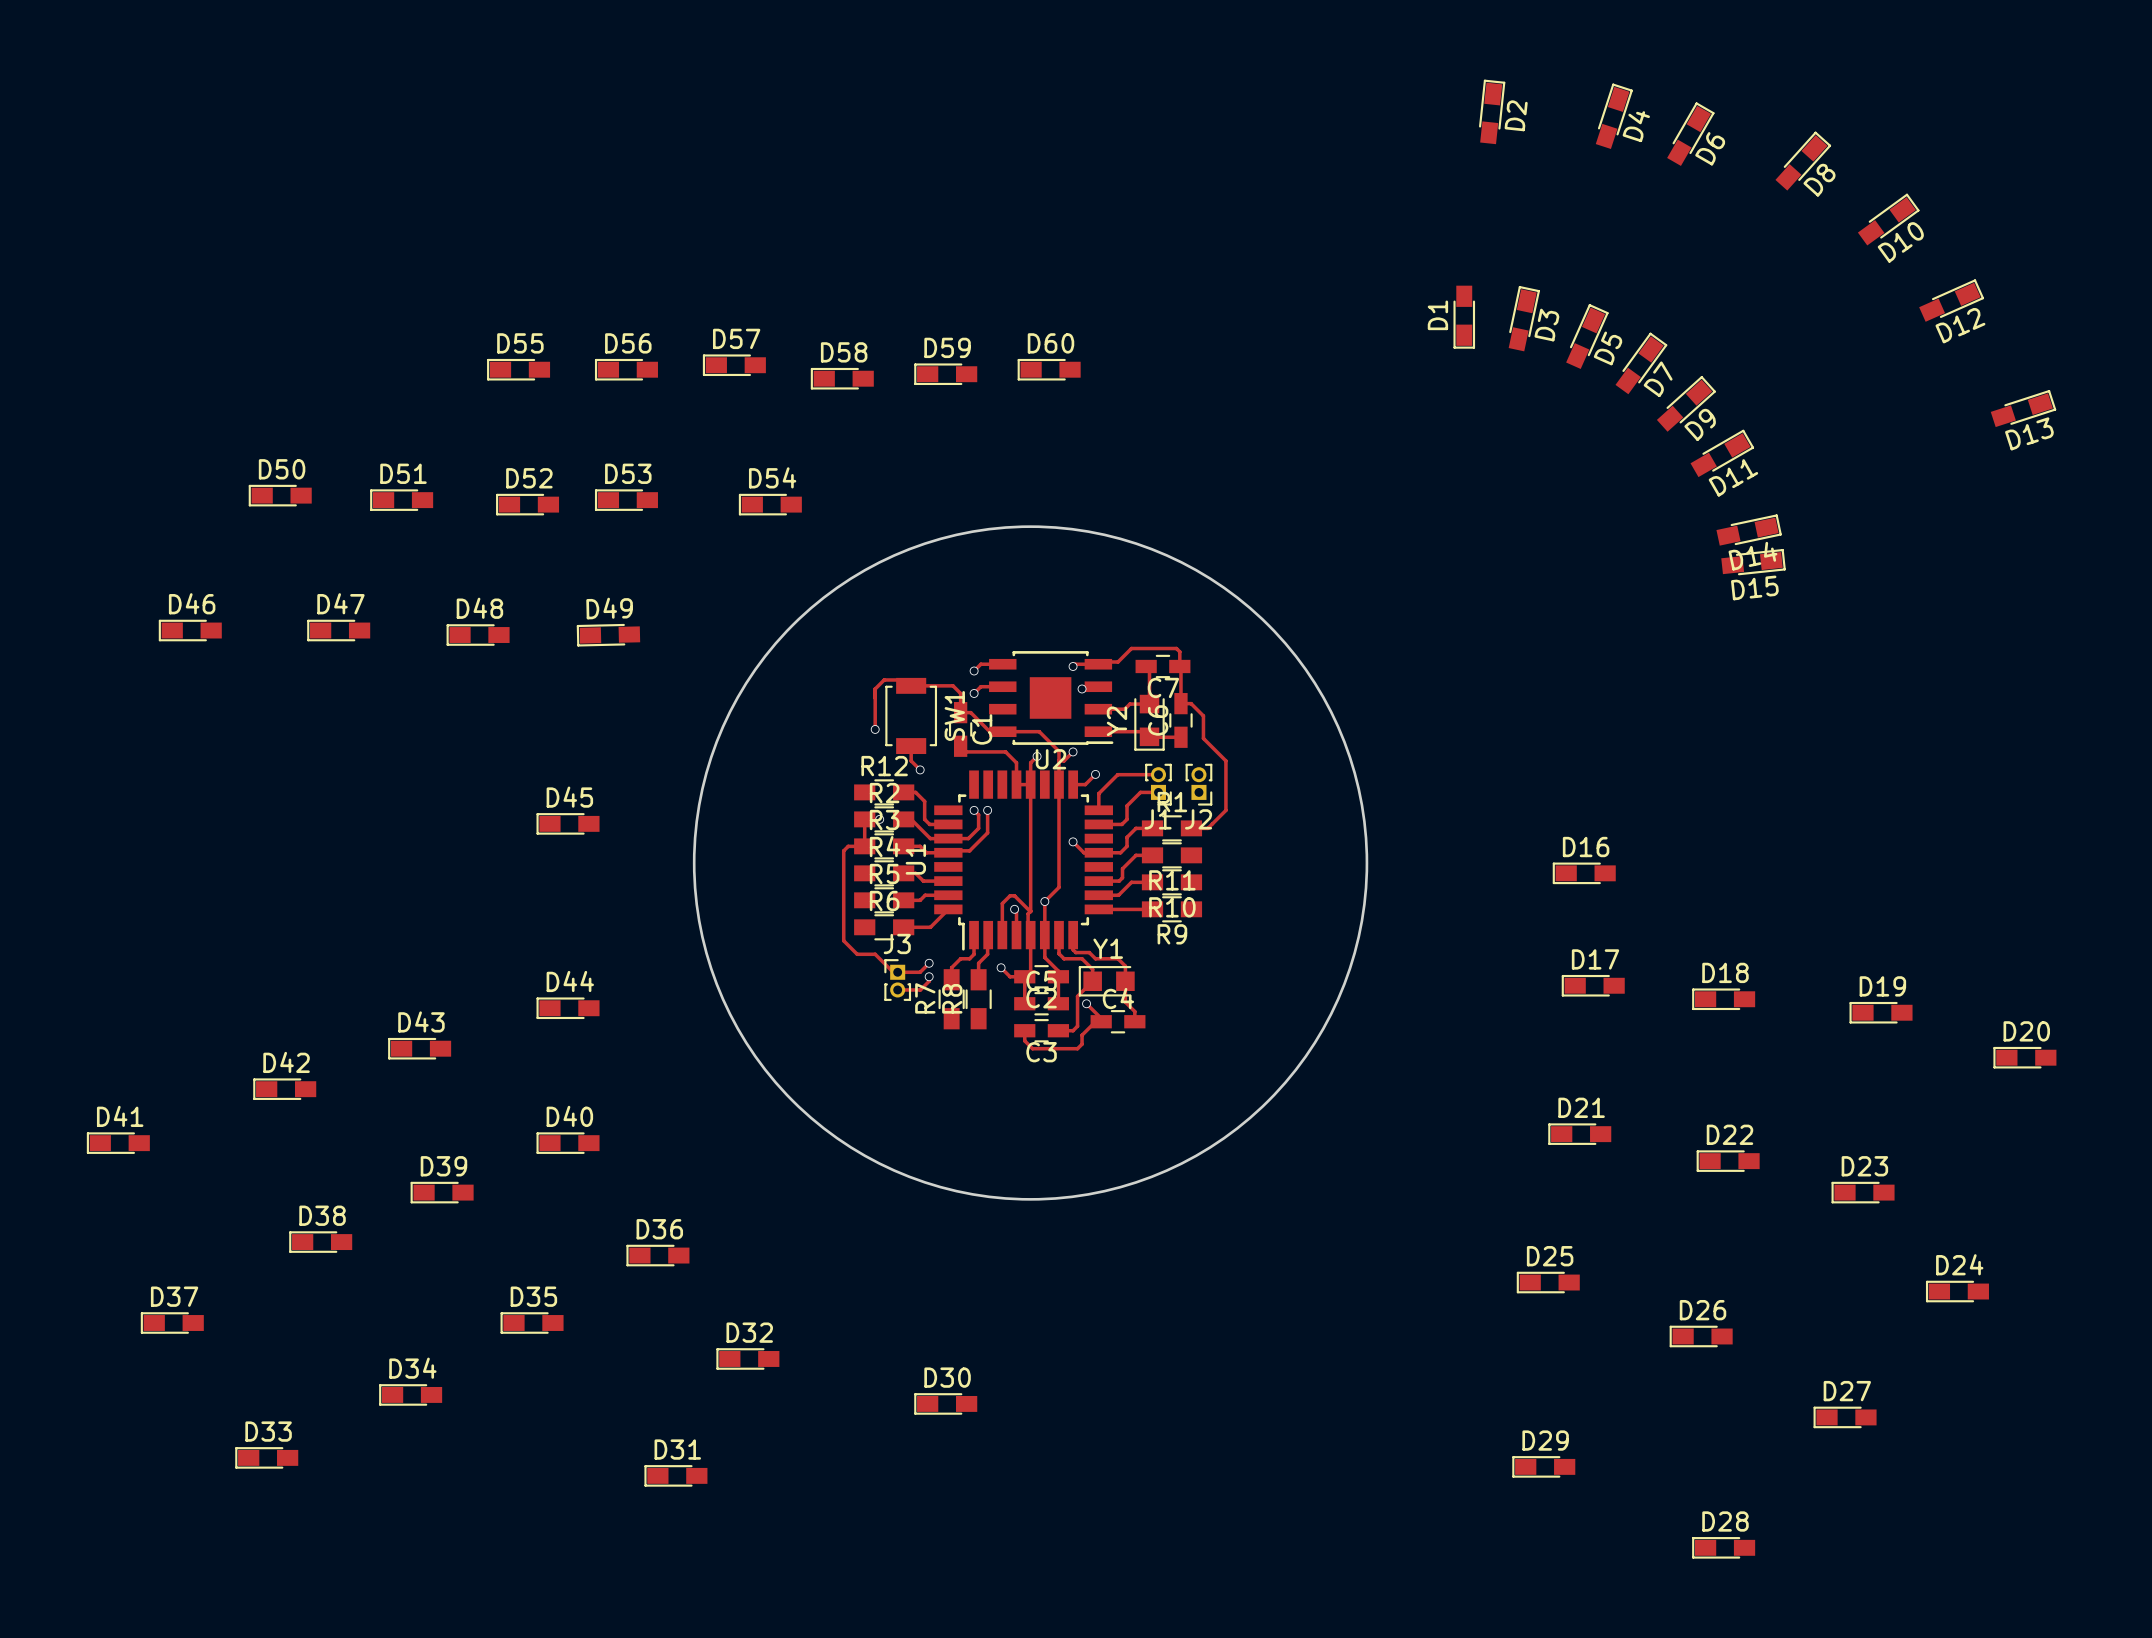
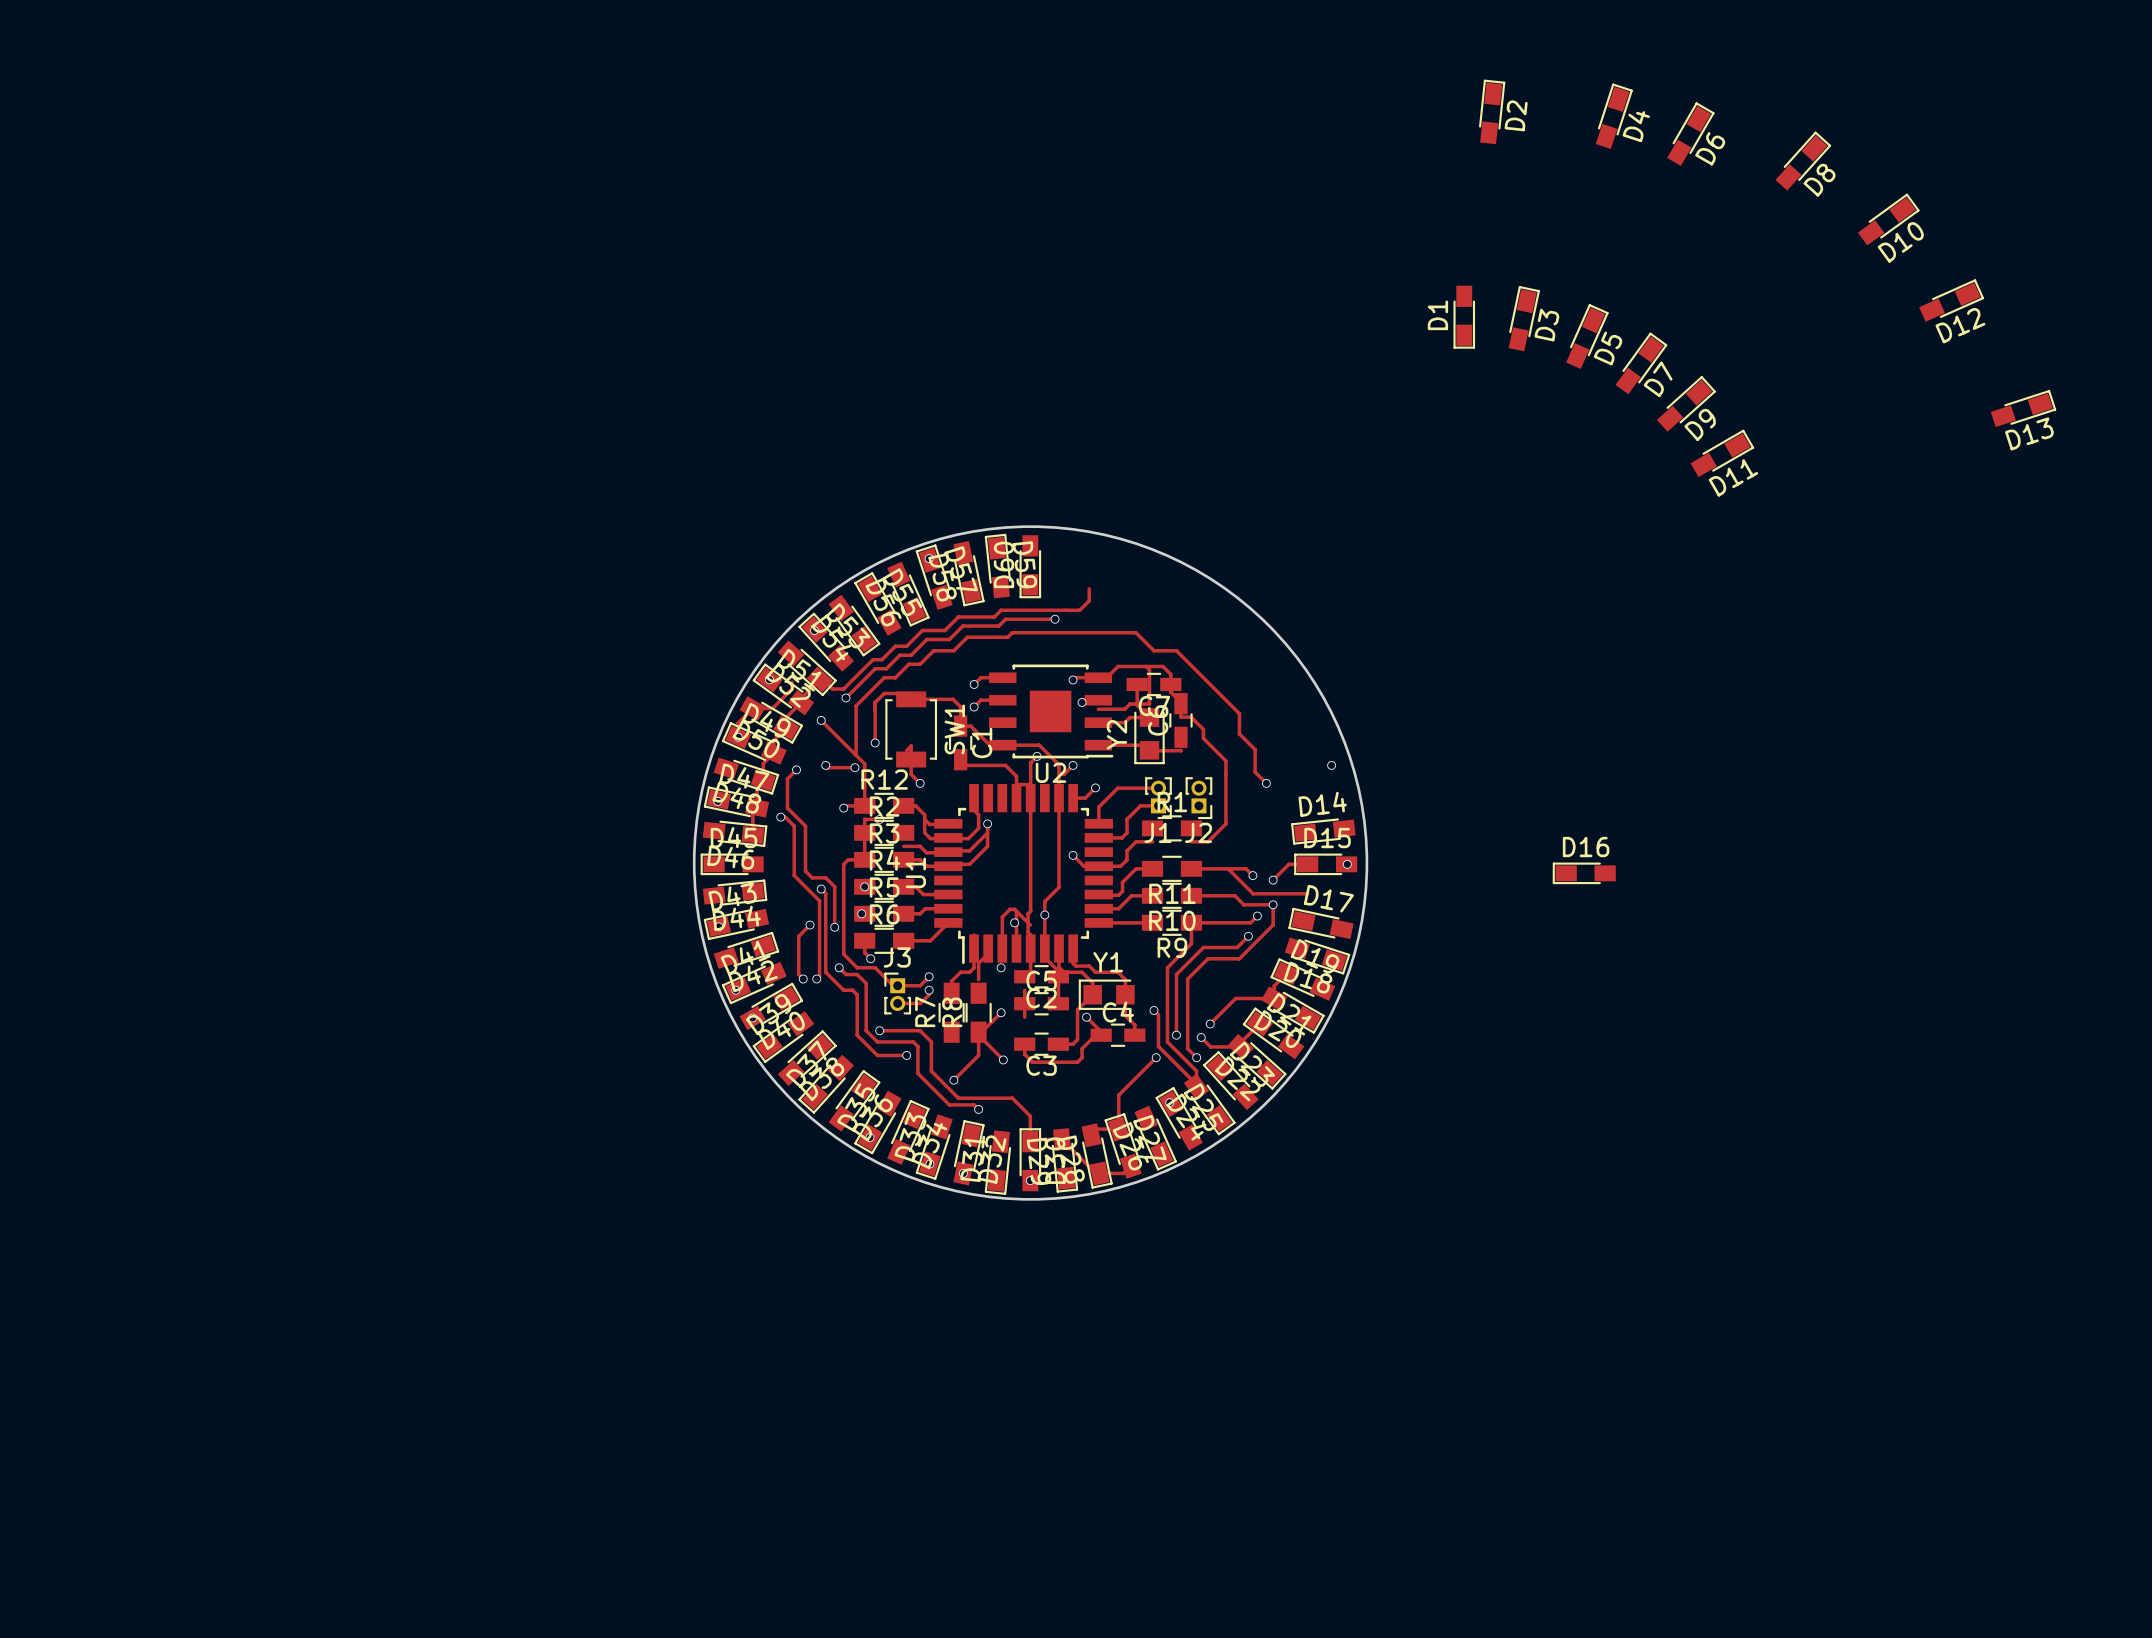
D57 rotation: 0° (734, 365) -> 72° clockwise (934, 577)
D57 position: (734, 365) -> (934, 577)
D55 rotation: 0° (518, 369) -> 60° clockwise (877, 604)
D55 position: (518, 369) -> (877, 604)
D56 rotation: 0° (626, 369) -> 114° counterclockwise (908, 594)
D56 position: (626, 369) -> (908, 594)
D60 rotation: 0° (1049, 369) -> 90° counterclockwise (1030, 566)
D60 position: (1049, 369) -> (1030, 566)
D59 rotation: 0° (945, 374) -> 84° clockwise (997, 566)
D59 position: (945, 374) -> (997, 566)
D58 rotation: 0° (842, 378) -> 102° counterclockwise (968, 573)
D58 position: (842, 378) -> (968, 573)
D50 rotation: 0° (280, 495) -> 150° counterclockwise (771, 719)
D50 position: (280, 495) -> (771, 719)
D51 rotation: 0° (401, 500) -> 36° clockwise (783, 689)
D51 position: (401, 500) -> (783, 689)
D53 rotation: 0° (626, 500) -> 48° clockwise (826, 642)
D53 position: (626, 500) -> (826, 642)
D52 rotation: 0° (527, 504) -> 138° counterclockwise (807, 668)
D52 position: (527, 504) -> (807, 668)
D54 rotation: 0° (770, 504) -> 126° counterclockwise (854, 625)
D54 position: (770, 504) -> (854, 625)
D14 rotation: 0° (1749, 530) -> 174° counterclockwise (1323, 831)
D14 position: (1749, 530) -> (1323, 831)
via: none -> (929, 558)
D15 rotation: 0° (1753, 562) -> 174° counterclockwise (1325, 864)
D15 position: (1753, 562) -> (1325, 864)
track: none -> (1089, 588) (1089, 600) (1079, 610) (1001, 610) (994, 617) (958, 617) (944, 630) (922, 630) (906, 646) (895, 646) (881, 659) (872, 659) (843, 688) (832, 688) (823, 679) (819, 679) (801, 698) (801, 702) (786, 717) (786, 727) (773, 740) (773, 753) (763, 763) (763, 780) (757, 786) (757, 807) (752, 811) (752, 834)
track: none -> (1055, 619) (1005, 619) (998, 626) (962, 626) (949, 639) (926, 639) (911, 655) (899, 655) (886, 668) (875, 668) (845, 697)
via: none -> (1055, 619)
D46 rotation: 0° (190, 630) -> 174° counterclockwise (735, 833)
D46 position: (190, 630) -> (735, 833)
D47 rotation: 0° (338, 630) -> 12° clockwise (736, 802)
D47 position: (338, 630) -> (736, 802)
via: none -> (814, 630)
D48 rotation: 0° (478, 635) -> 162° counterclockwise (746, 776)
D48 position: (478, 635) -> (746, 776)
D49 rotation: 0° (608, 635) -> 25.3° clockwise (754, 743)
D49 position: (608, 635) -> (754, 743)
track: (1002, 664) (980, 664) (974, 670) -> (1002, 677) (980, 677) (974, 684)
track: (1073, 666) (1075, 664) (1118, 662) (1131, 648) (1176, 648) (1179, 651) (1180, 702) -> (1073, 679) (1075, 677) (1106, 677) (1118, 666) (1162, 666) (1170, 674) (1170, 692) (1180, 702)
via: (1073, 666) -> none
C7 position: (1162, 666) -> (1153, 684)
via: (974, 670) -> none
via: none -> (769, 679)
via: none -> (1073, 679)
track: none -> (792, 682) (792, 688) (772, 708) (752, 708) (738, 722) (736, 737)
via: none -> (974, 684)
track: none -> (1137, 684) (1137, 705) (1149, 717) (1129, 717) (1124, 722) (1098, 722)
track: (1002, 686) (980, 686) (974, 693) -> (1002, 700) (980, 700) (974, 706)
via: (1082, 688) -> none
via: (974, 693) -> none
via: none -> (845, 697)
U2 position: (1051, 697) -> (1051, 711)
track: (875, 702) (875, 688) (884, 679) (905, 679) (911, 685) (953, 685) (960, 693) (960, 706) -> (875, 702) (884, 693) (905, 693) (911, 699) (953, 699) (960, 706)
via: none -> (1082, 702)
track: (1180, 703) (1191, 703) (1203, 715) (1203, 729) -> (1180, 703) (1180, 717) (1191, 717) (1203, 729)
via: none -> (974, 706)
track: (960, 712) (970, 712) (989, 731) (1039, 731) (1058, 751) (1058, 764) -> (960, 712) (960, 726) (970, 726) (989, 745) (1039, 745) (1058, 764)
SW1 position: (911, 715) -> (911, 729)
track: none -> (821, 720) (864, 763) (864, 805) (845, 805) (843, 808)
via: none -> (821, 720)
Y2 position: (1149, 722) -> (1149, 736)
via position: (875, 729) -> (875, 742)
C1 position: (960, 729) -> (960, 742)
track: (1098, 731) (1144, 731) (1149, 737) (1180, 736) -> (1098, 745) (1144, 745) (1149, 750) (1180, 750)
via: none -> (738, 737)
track: (960, 746) (966, 751) (1005, 751) (1016, 762) (1016, 776) -> (960, 759) (966, 765) (1005, 765) (1016, 776)
track: (1073, 751) (1064, 760) (1058, 760) -> (1073, 765) (1064, 774) (1058, 774)
via: (1073, 751) -> none
track: none -> (856, 755) (856, 705) (884, 677) (895, 677) (908, 664) (920, 664) (933, 650) (953, 650) (967, 637) (1007, 637) (1012, 632) (1136, 632) (1153, 650) (1176, 650) (1239, 713) (1239, 733) (1255, 749) (1255, 772) (1266, 783)
track: (911, 760) (920, 769) -> (911, 760) (911, 774) (920, 783)
track: none -> (825, 765) (827, 767) (854, 767)
via: none -> (825, 765)
via: none -> (1073, 765)
via: none -> (1331, 765)
via: none -> (854, 767)
track: none -> (796, 769) (787, 778) (787, 808) (805, 826) (805, 871) (812, 877) (825, 877) (834, 886) (834, 927)
via: none -> (796, 769)
via position: (920, 769) -> (920, 783)
track: (1095, 774) (1085, 784) (1073, 784) -> (1095, 787) (1085, 798) (1073, 798)
via: (1095, 774) -> none
track: (1158, 774) (1117, 774) (1098, 793) (1098, 807) -> (1158, 788) (1117, 788) (1098, 807)
via: none -> (1266, 783)
J1 position: (1158, 784) -> (1158, 798)
J2 position: (1198, 784) -> (1198, 798)
via: none -> (1095, 787)
R12 position: (884, 792) -> (884, 805)
track: (903, 792) (915, 792) (924, 801) (924, 814) -> (903, 805) (915, 805) (924, 814)
track: (1158, 792) (1140, 792) (1127, 805) (1127, 819) (1121, 824) (1098, 824) -> (1098, 810) (1098, 823)
via: none -> (717, 801)
track: none -> (1158, 805) (1140, 805) (1127, 819) (1127, 832) (1121, 837) (1098, 837)
via: none -> (843, 808)
via: (974, 810) -> none
track: (987, 810) (987, 823) -> (875, 729) (875, 742)
via: (987, 810) -> none
track: (1225, 810) (1207, 828) (1191, 828) -> (1225, 810) (1225, 823) (1207, 841) (1191, 841)
track: none -> (780, 817) (785, 817) (794, 826) (794, 875) (819, 900) (819, 976) (816, 979)
via: none -> (780, 817)
R2 position: (884, 819) -> (884, 832)
track: (903, 819) (911, 819) (924, 832) -> (924, 819) (924, 832)
D45 position: (568, 823) -> (732, 864)
via: none -> (987, 823)
track: (1152, 828) (1136, 828) (1127, 837) (1127, 846) (1120, 852) (1083, 852) (1073, 841) -> (1152, 841) (1136, 841) (1127, 850) (1127, 859) (1120, 866) (1083, 866) (1073, 855)
track: none -> (987, 832) (987, 846) (969, 864) (926, 866) (920, 859) (903, 859)
via position: (1073, 841) -> (1073, 855)
track: (864, 846) (848, 846) (843, 850) (843, 864) -> (864, 846) (864, 859) (848, 859) (843, 864)
R3 position: (884, 846) -> (884, 859)
track: (1152, 855) (1136, 855) (1122, 868) (1122, 877) (1119, 881) (1096, 881) -> none
R11 position: (1171, 855) -> (1171, 868)
U1 position: (1023, 860) -> (1023, 874)
track: none -> (1307, 864) (1288, 864) (1273, 880)
via: none -> (1347, 864)
track: none -> (1191, 868) (1246, 868) (1252, 875)
track: none -> (1228, 868) (1253, 893) (1307, 893)
R4 position: (884, 873) -> (884, 886)
track: (903, 873) (915, 873) (923, 881) (948, 881) -> none
via: none -> (1252, 875)
via: none -> (1273, 880)
track: (1152, 882) (1131, 882) (1122, 891) -> (1152, 868) (1136, 868) (1122, 882) (1122, 891)
R10 position: (1171, 882) -> (1171, 895)
via: none -> (864, 886)
track: none -> (821, 889) (825, 893) (825, 972) (843, 990) (852, 990) (857, 994) (857, 1035) (877, 1055) (906, 1055)
via: none -> (821, 889)
track: (948, 895) (925, 895) (920, 900) (903, 900) -> (948, 894) (923, 894) (915, 886) (903, 886)
track: none -> (1152, 895) (1131, 895) (1118, 908) (1096, 908)
track: none -> (1191, 895) (1234, 895) (1243, 904) (1273, 904) (1273, 925) (1239, 958) (1207, 958) (1187, 979) (1187, 1048) (1196, 1057)
R5 position: (884, 900) -> (884, 913)
via position: (1044, 901) -> (1044, 915)
via: none -> (1273, 904)
track: (948, 909) (930, 927) (903, 927) -> (948, 908) (925, 908) (920, 913) (903, 913)
via position: (1014, 909) -> (1014, 922)
track: (1095, 909) (1152, 909) -> (1095, 922) (1152, 922)
R9 position: (1171, 909) -> (1171, 922)
track: none -> (1016, 911) (1030, 925)
track: (1030, 911) (1014, 895) (1010, 895) (1002, 903) (1002, 917) -> (1014, 909) (1010, 909) (1002, 917)
via: none -> (861, 913)
track: none -> (1257, 916) (1250, 922) (1191, 922) (1191, 943) (1167, 967) (1167, 1041) (1196, 1070) (1196, 1086)
via: none -> (1257, 916)
track: none -> (948, 922) (930, 940) (903, 940)
track: none -> (810, 925) (798, 936) (798, 974) (803, 979)
via: none -> (810, 925)
via: none -> (719, 926)
via: none -> (834, 927)
R6 position: (884, 927) -> (884, 940)
track: none -> (1248, 936) (1237, 947) (1203, 947) (1176, 974) (1176, 1035)
via: none -> (1248, 936)
track: (843, 940) (857, 954) (875, 954) (893, 972) (920, 972) (929, 963) -> (843, 940) (843, 954) (857, 967) (875, 967) (893, 985) (920, 985) (929, 976)
track: none -> (864, 940) (864, 952) (870, 958)
track: (1073, 949) (1075, 952) (1089, 952) (1095, 958) (1118, 958) (1125, 966) (1125, 979) -> (1092, 969) (1095, 972) (1118, 972) (1125, 979)
track: (1058, 953) (1064, 958) (1082, 958) (1089, 966) -> (1073, 949) (1073, 963) (1075, 966) (1089, 966)
track: (974, 954) (969, 958) (960, 958) (951, 967) (951, 979) -> (974, 954) (974, 967) (969, 972) (960, 972) (951, 981) (951, 993)
via: none -> (870, 958)
via position: (929, 963) -> (929, 990)
track: none -> (839, 967) (845, 974) (857, 974) (866, 983) (866, 1030) (877, 1041) (913, 1041) (917, 1046) (917, 1073) (949, 1104) (974, 1104) (978, 1109)
via: none -> (839, 967)
track: (1001, 967) (1010, 976) (1024, 976) (1024, 990) -> none
track: (1092, 969) (1092, 981) (1077, 996) (1077, 1009) -> (1058, 953) (1058, 967) (1064, 972) (1082, 972) (1092, 982) (1092, 994) (1077, 1009)
track: none -> (1286, 973) (1274, 985) (1274, 998) (1235, 998) (1210, 1023)
track: (929, 976) (929, 981) (920, 989) (897, 990) -> (929, 990) (929, 994) (920, 1003) (897, 1003)
via: none -> (803, 979)
via: none -> (816, 979)
J3 position: (897, 980) -> (897, 993)
Y1 position: (1106, 981) -> (1106, 994)
D17 rotation: 0° (1593, 985) -> 12° clockwise (1321, 923)
D17 position: (1593, 985) -> (1321, 923)
via: none -> (735, 990)
R7 position: (951, 999) -> (951, 1012)
R8 position: (978, 999) -> (978, 1012)
D18 rotation: 0° (1723, 999) -> 162° counterclockwise (1317, 955)
D18 position: (1723, 999) -> (1317, 955)
track: (1125, 1002) (1134, 1011) (1134, 1021) -> (1125, 1002) (1125, 1015) (1134, 1025) (1134, 1035)
track: none -> (1024, 1003) (1024, 1017)
track: (1086, 1003) (1101, 1018) (1101, 1021) (1095, 1021) (1082, 1035) (1082, 1044) (1077, 1048) (1032, 1048) (1024, 1040) (1024, 1030) -> (1086, 1017) (1101, 1031) (1101, 1035) (1095, 1035) (1082, 1048) (1082, 1057) (1077, 1062) (1032, 1062) (1024, 1054) (1024, 1044)
via position: (1086, 1003) -> (1086, 1017)
D44 rotation: 0° (568, 1008) -> 174° clockwise (735, 892)
D44 position: (568, 1008) -> (735, 892)
track: none -> (1153, 1010) (1158, 1014) (1158, 1046) (1196, 1084)
via: none -> (1153, 1010)
track: none -> (1001, 1012) (981, 1032) (978, 1032) (978, 1055) (953, 1080)
via: none -> (1001, 1012)
D19 rotation: 0° (1881, 1012) -> 24° clockwise (1302, 979)
D19 position: (1881, 1012) -> (1302, 979)
via: none -> (752, 1017)
C4 position: (1118, 1021) -> (1118, 1035)
via: none -> (1210, 1023)
track: none -> (1259, 1023) (1240, 1042) (1240, 1046) (1210, 1046) (1201, 1037)
track: (1077, 1026) (1073, 1030) (1058, 1030) -> (1077, 1026) (1077, 1039) (1073, 1044) (1058, 1044)
track: none -> (879, 1030) (920, 1030) (931, 1041) (931, 1071) (958, 1098) (1012, 1098) (1030, 1116) (1030, 1141) (1032, 1139) (1062, 1139) (1095, 1173) (1123, 1173) (1135, 1161)
via: none -> (879, 1030)
C3 position: (1041, 1030) -> (1041, 1044)
track: none -> (978, 1035) (1003, 1059)
via: none -> (1176, 1035)
via: none -> (1201, 1037)
D43 rotation: 0° (419, 1048) -> 12° counterclockwise (736, 924)
D43 position: (419, 1048) -> (736, 924)
via: none -> (906, 1055)
track: none -> (1156, 1057) (1118, 1095) (1118, 1129) (1096, 1129) (1091, 1135)
via: none -> (1156, 1057)
via: none -> (1196, 1057)
D20 rotation: 0° (2024, 1057) -> 150° counterclockwise (1292, 1009)
D20 position: (2024, 1057) -> (1292, 1009)
via: none -> (1003, 1059)
via: none -> (953, 1080)
D42 rotation: 0° (284, 1089) -> 162° clockwise (746, 950)
D42 position: (284, 1089) -> (746, 950)
via: none -> (1169, 1102)
via: none -> (978, 1109)
D21 rotation: 0° (1579, 1134) -> 36° clockwise (1273, 1033)
D21 position: (1579, 1134) -> (1273, 1033)
via: none -> (869, 1137)
D41 rotation: 0° (118, 1143) -> 24° counterclockwise (754, 982)
D41 position: (118, 1143) -> (754, 982)
D40 rotation: 0° (568, 1143) -> 150° clockwise (771, 1006)
D40 position: (568, 1143) -> (771, 1006)
D22 rotation: 0° (1728, 1161) -> 138° counterclockwise (1256, 1061)
D22 position: (1728, 1161) -> (1256, 1061)
via: none -> (929, 1163)
via: none -> (963, 1173)
via: none -> (1030, 1180)
D39 rotation: 0° (442, 1192) -> 36° counterclockwise (783, 1036)
D39 position: (442, 1192) -> (783, 1036)
D23 rotation: 0° (1863, 1192) -> 48° clockwise (1230, 1080)
D23 position: (1863, 1192) -> (1230, 1080)
D38 rotation: 0° (320, 1242) -> 138° clockwise (807, 1058)
D38 position: (320, 1242) -> (807, 1058)
D36 rotation: 0° (657, 1255) -> 126° clockwise (854, 1100)
D36 position: (657, 1255) -> (854, 1100)
D25 rotation: 0° (1548, 1282) -> 60° clockwise (1179, 1118)
D25 position: (1548, 1282) -> (1179, 1118)
D24 rotation: 0° (1957, 1291) -> 126° counterclockwise (1209, 1104)
D24 position: (1957, 1291) -> (1209, 1104)
D37 rotation: 0° (172, 1323) -> 48° counterclockwise (826, 1084)
D37 position: (172, 1323) -> (826, 1084)
D35 rotation: 0° (532, 1323) -> 60° counterclockwise (877, 1122)
D35 position: (532, 1323) -> (877, 1122)
D26 rotation: 0° (1701, 1336) -> 114° counterclockwise (1155, 1138)
D26 position: (1701, 1336) -> (1155, 1138)
D32 rotation: 0° (747, 1358) -> 102° clockwise (968, 1152)
D32 position: (747, 1358) -> (968, 1152)
D34 rotation: 0° (410, 1394) -> 114° clockwise (908, 1132)
D34 position: (410, 1394) -> (908, 1132)
D30 rotation: 0° (945, 1403) -> 90° clockwise (1030, 1159)
D30 position: (945, 1403) -> (1030, 1159)
D27 rotation: 0° (1845, 1417) -> 72° clockwise (1123, 1145)
D27 position: (1845, 1417) -> (1123, 1145)
D33 rotation: 0° (266, 1457) -> 72° counterclockwise (934, 1147)
D33 position: (266, 1457) -> (934, 1147)
D29 rotation: 0° (1543, 1466) -> 96° counterclockwise (1064, 1160)
D29 position: (1543, 1466) -> (1064, 1160)
D31 rotation: 0° (675, 1475) -> 84° counterclockwise (997, 1162)
D31 position: (675, 1475) -> (997, 1162)
D28 rotation: 0° (1723, 1547) -> 102° counterclockwise (1097, 1155)
D28 position: (1723, 1547) -> (1097, 1155)

